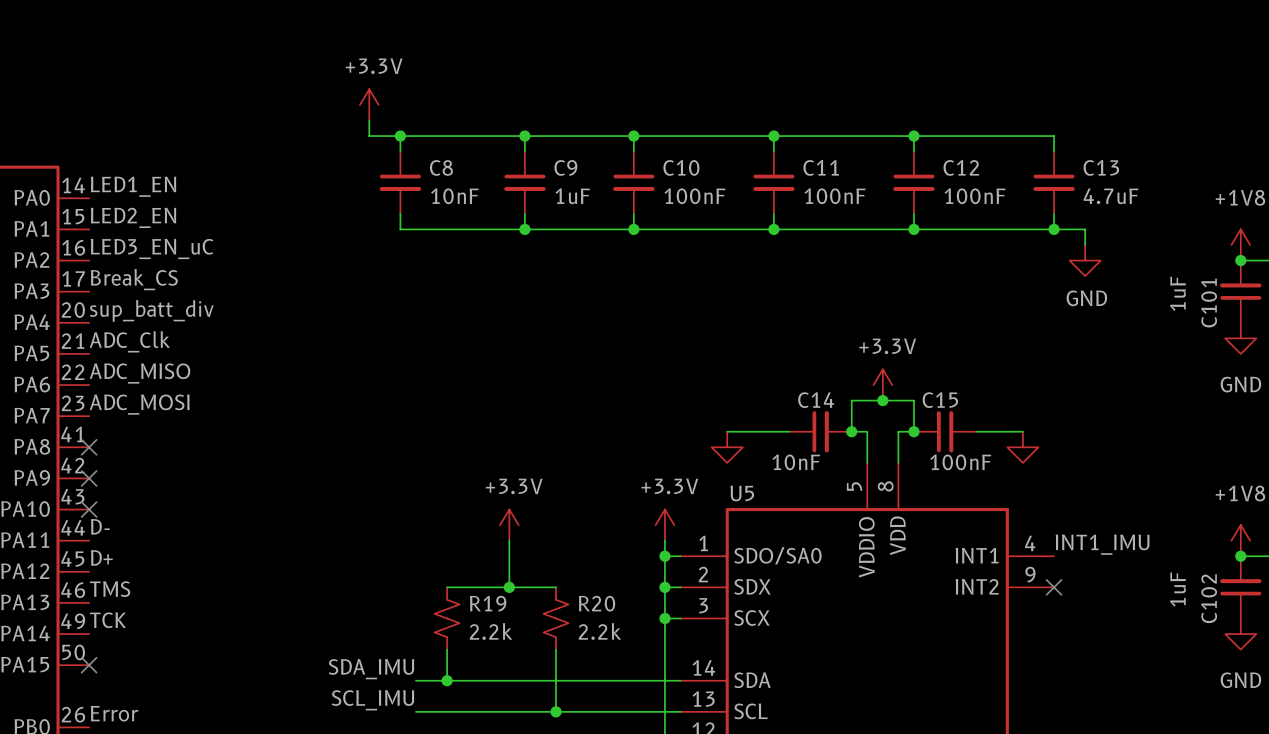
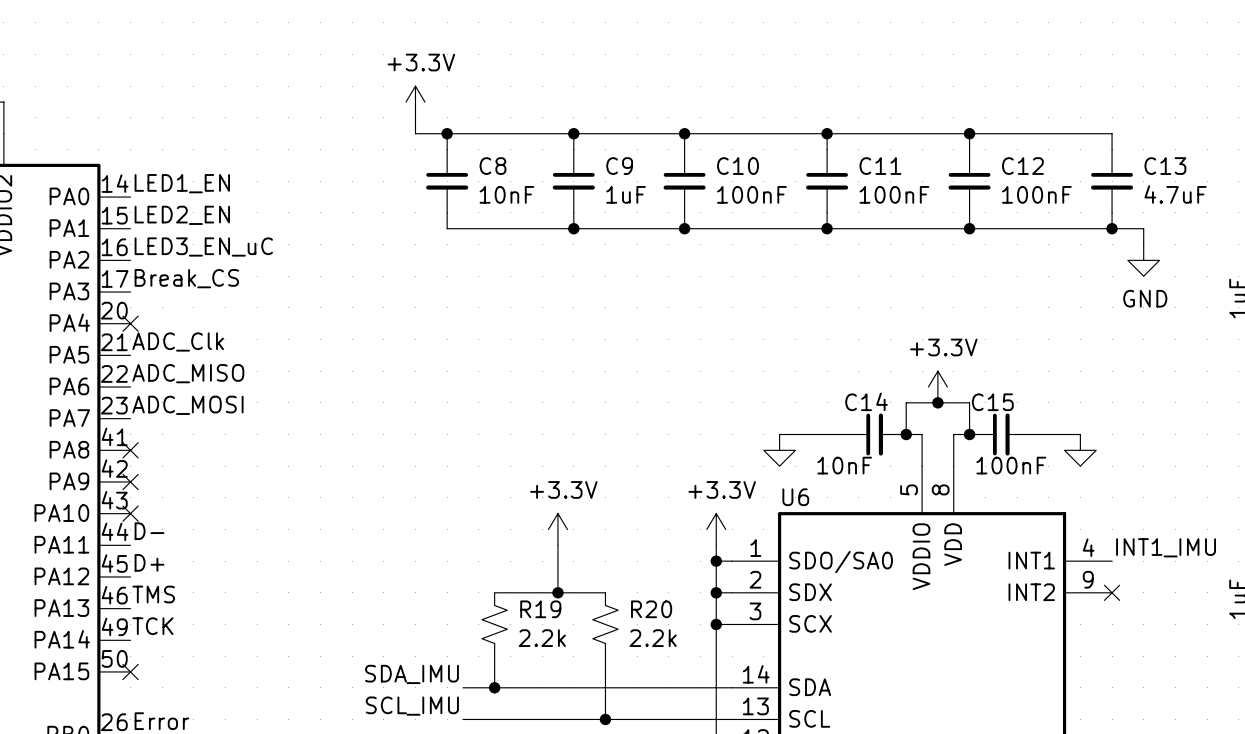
label: sup_batt_div (151, 310) -> none
no-connect mark: none -> (130, 323)
U5 name: U5 (742, 493) -> U6 (795, 497)

